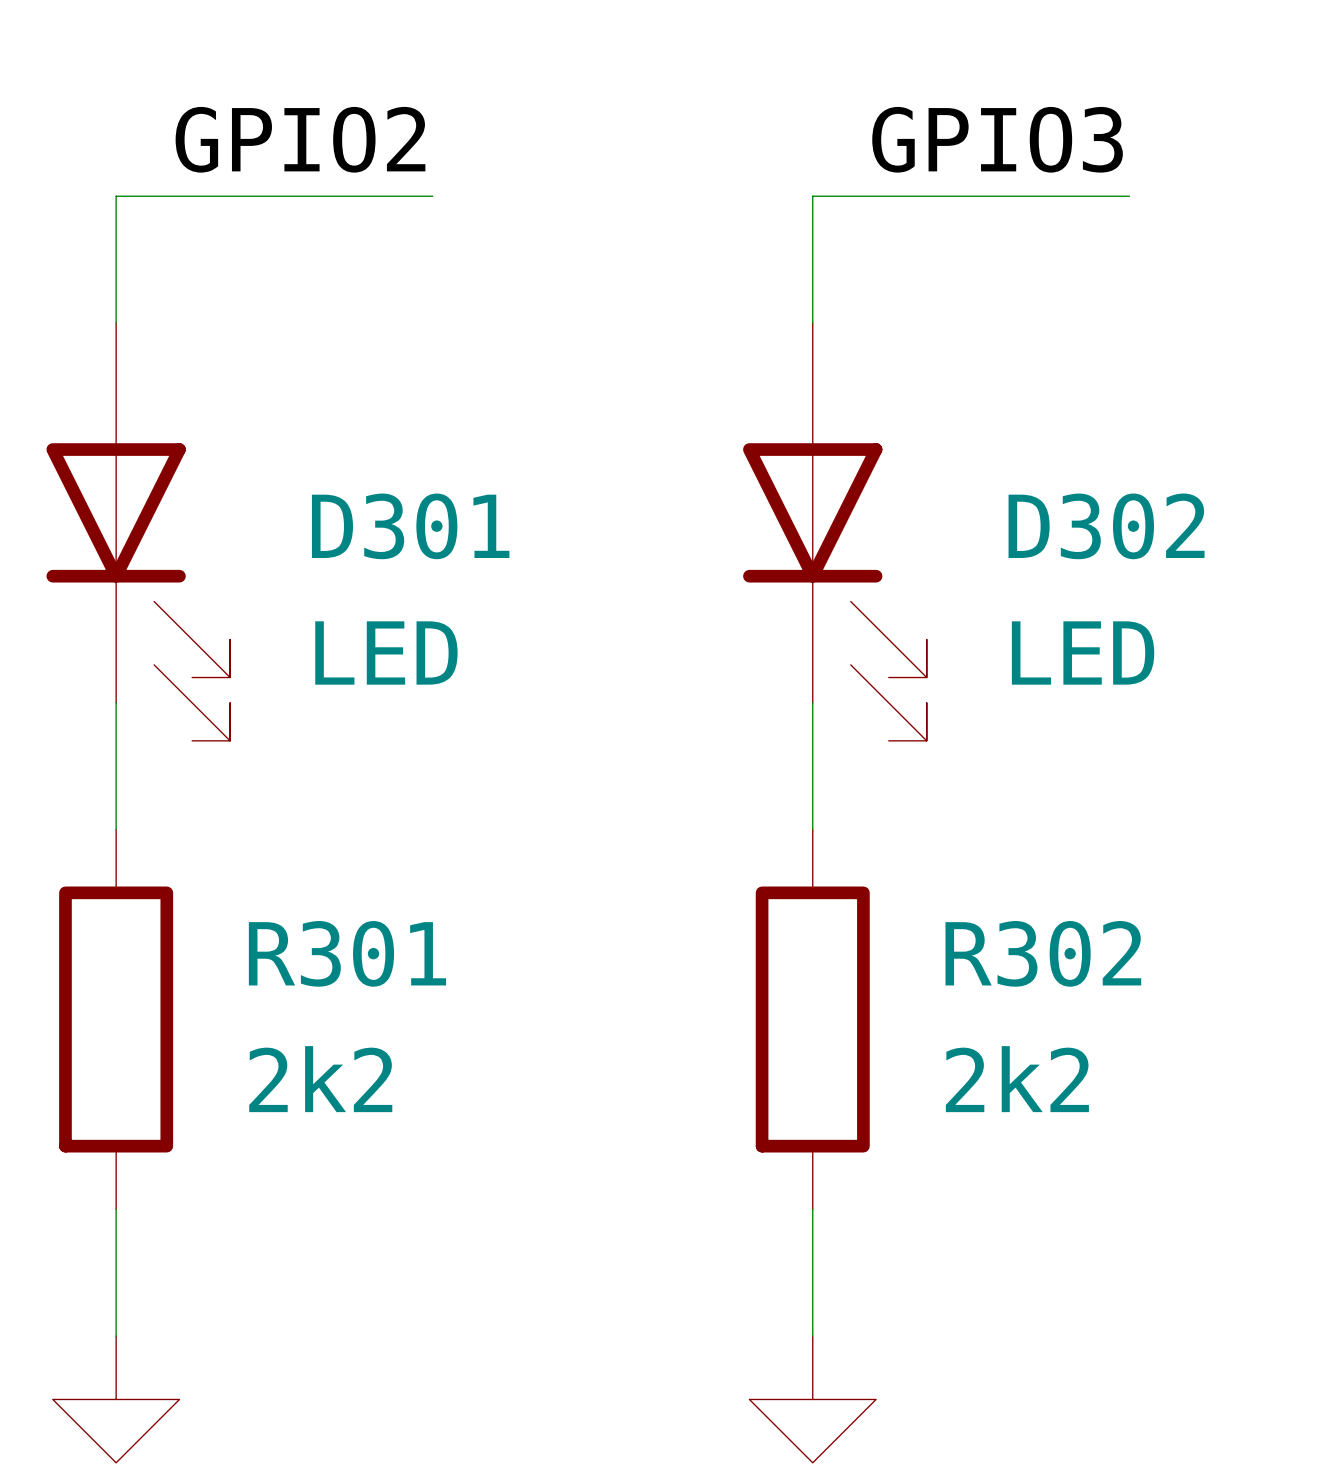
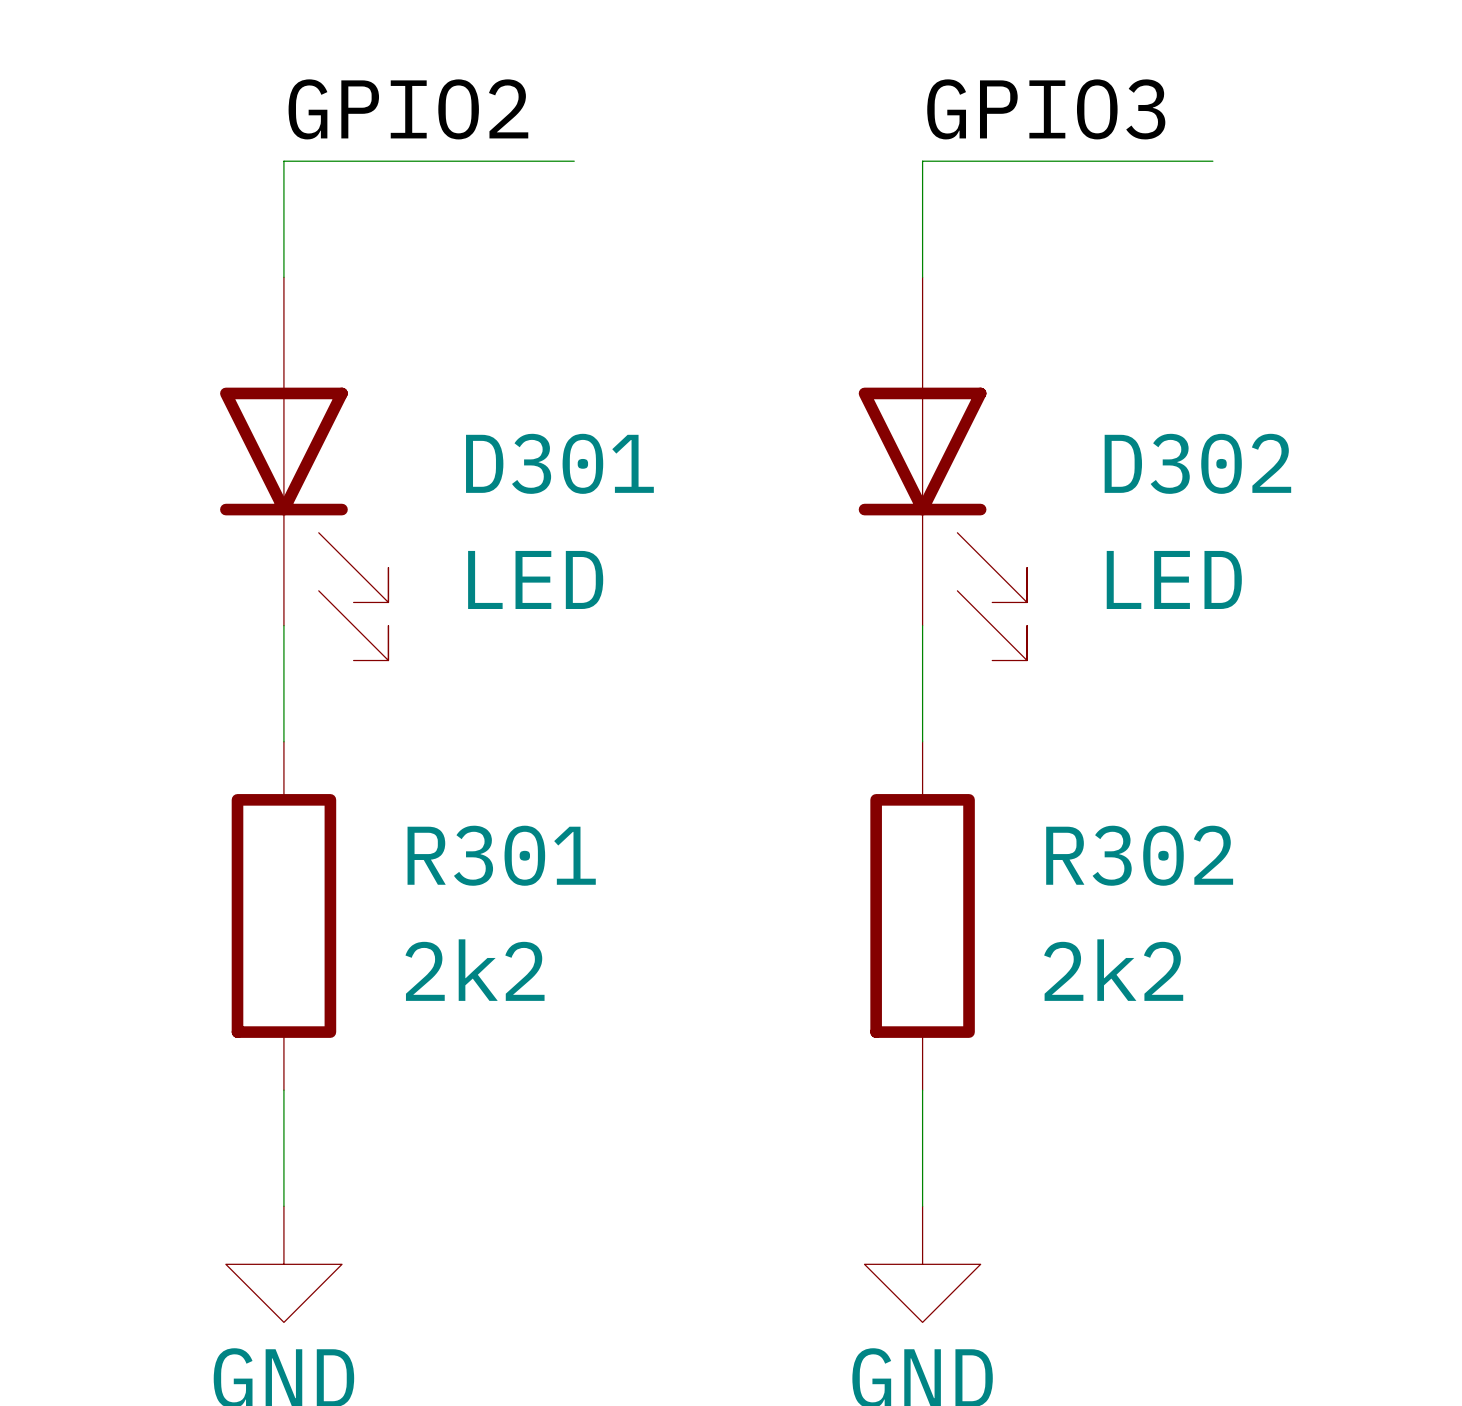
label position: GPIO2 (300, 139) -> GPIO2 (408, 109)
label position: GPIO3 (997, 139) -> GPIO3 (1046, 109)

